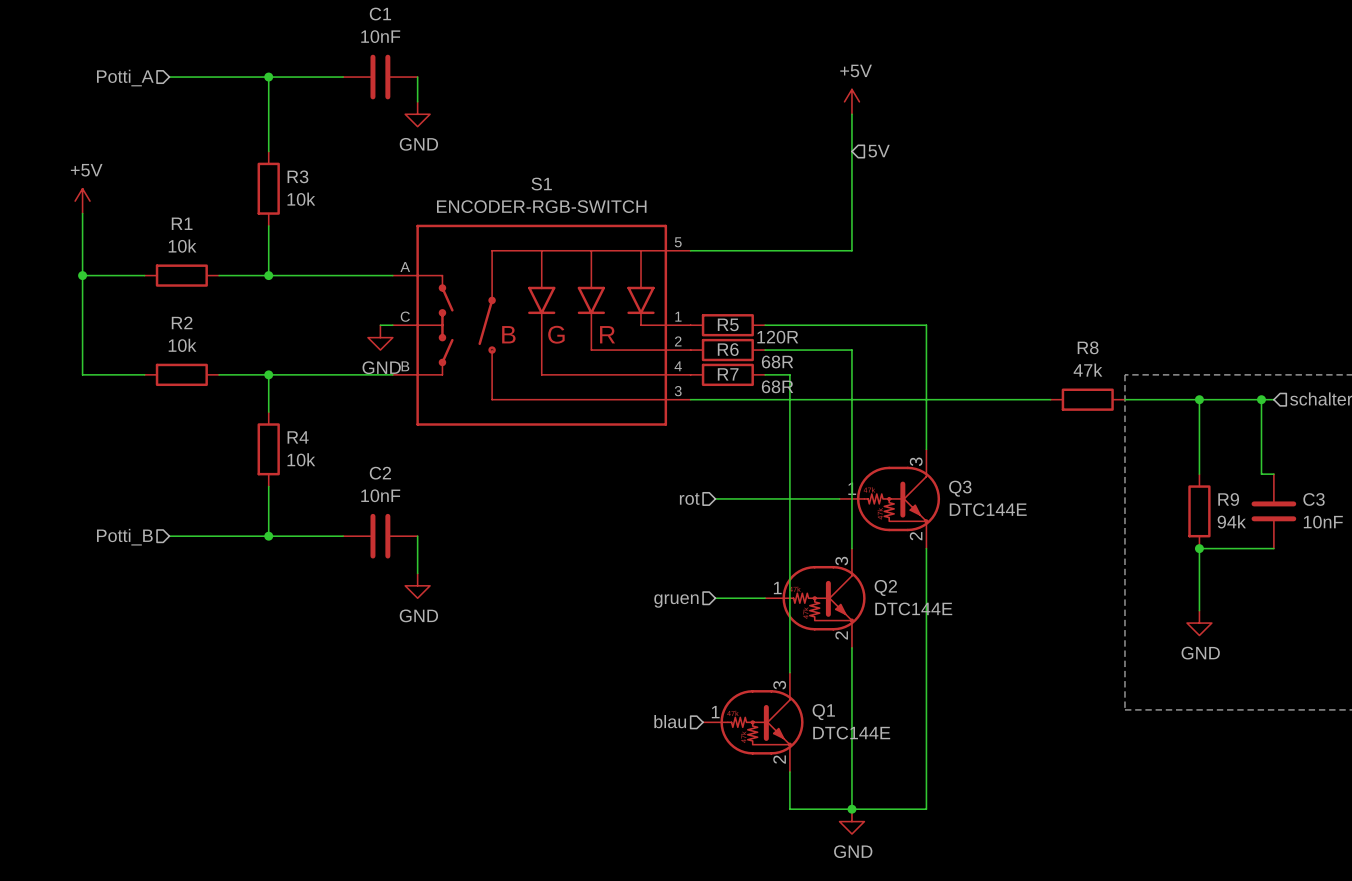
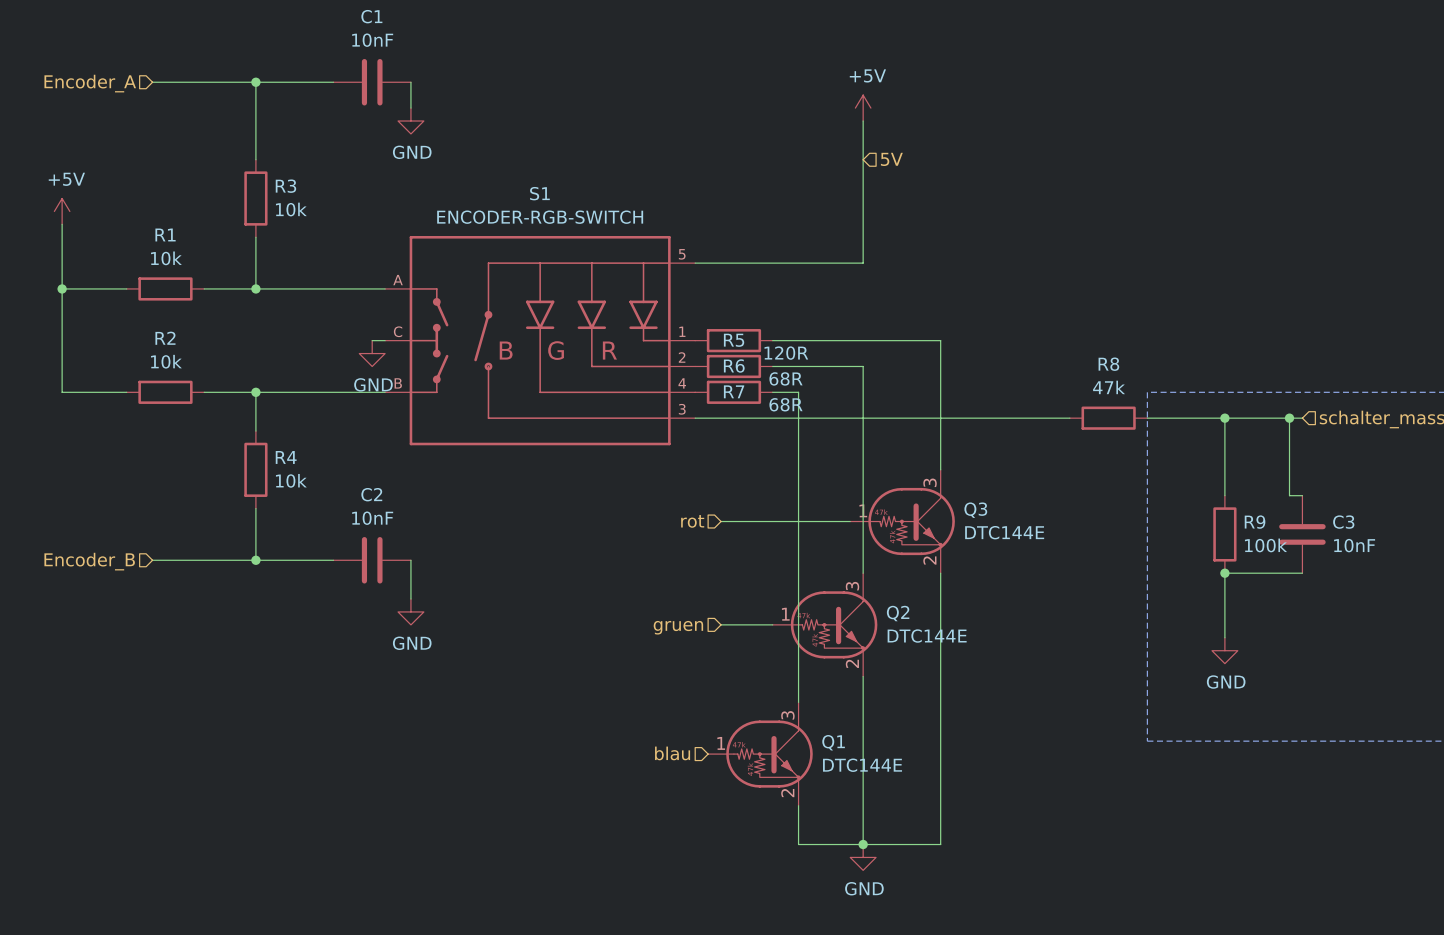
hierarchical label: Potti_A (125, 78) -> Encoder_A (90, 83)
R9 value: 94k (1231, 521) -> 100k (1265, 545)
hierarchical label: Potti_B (124, 537) -> Encoder_B (89, 561)

